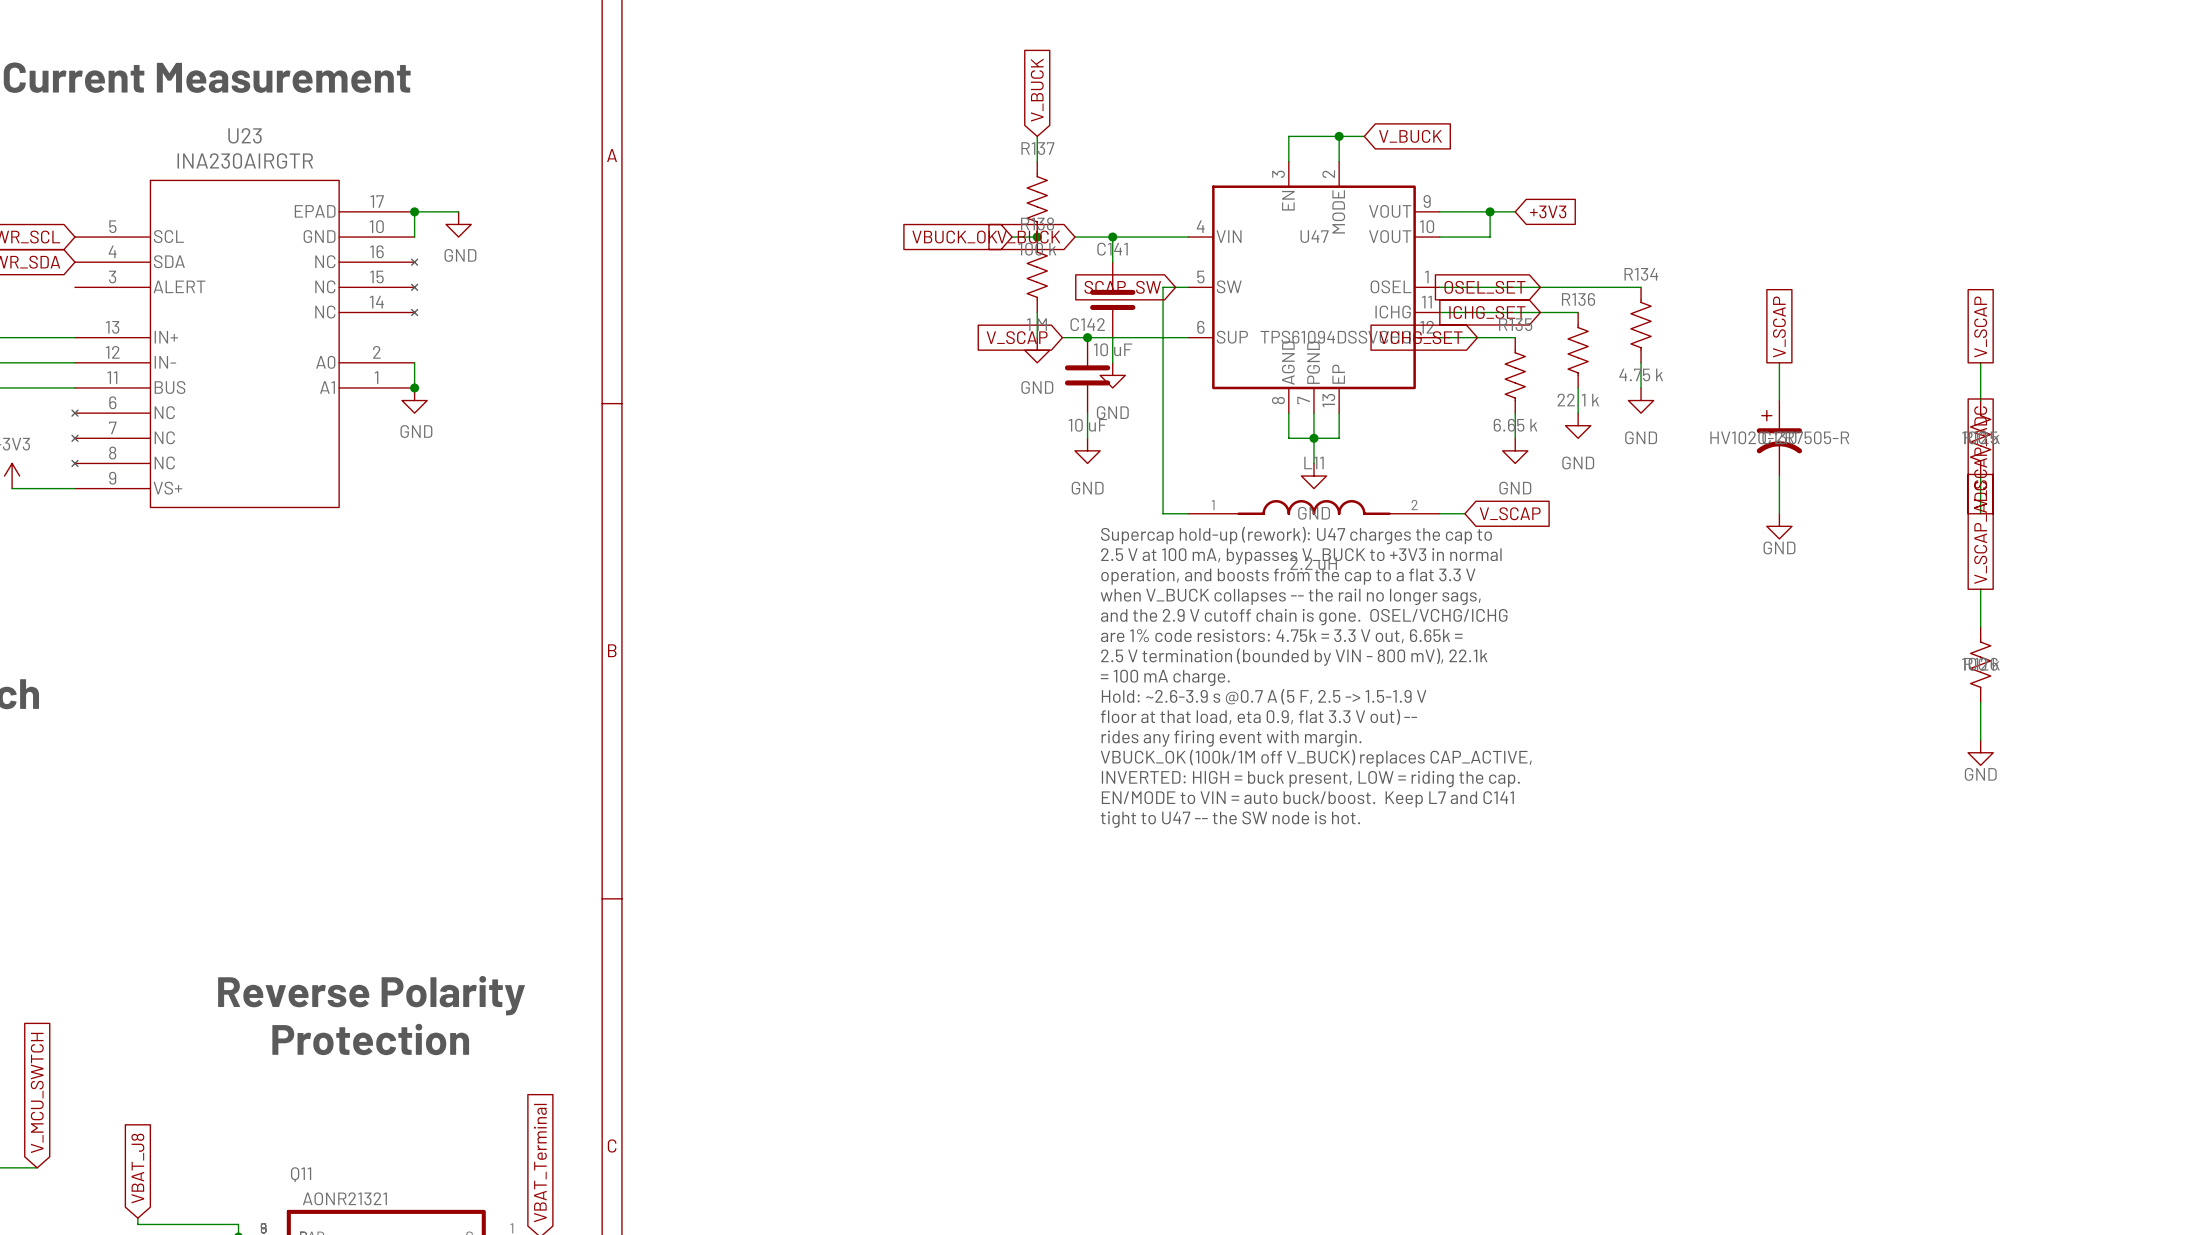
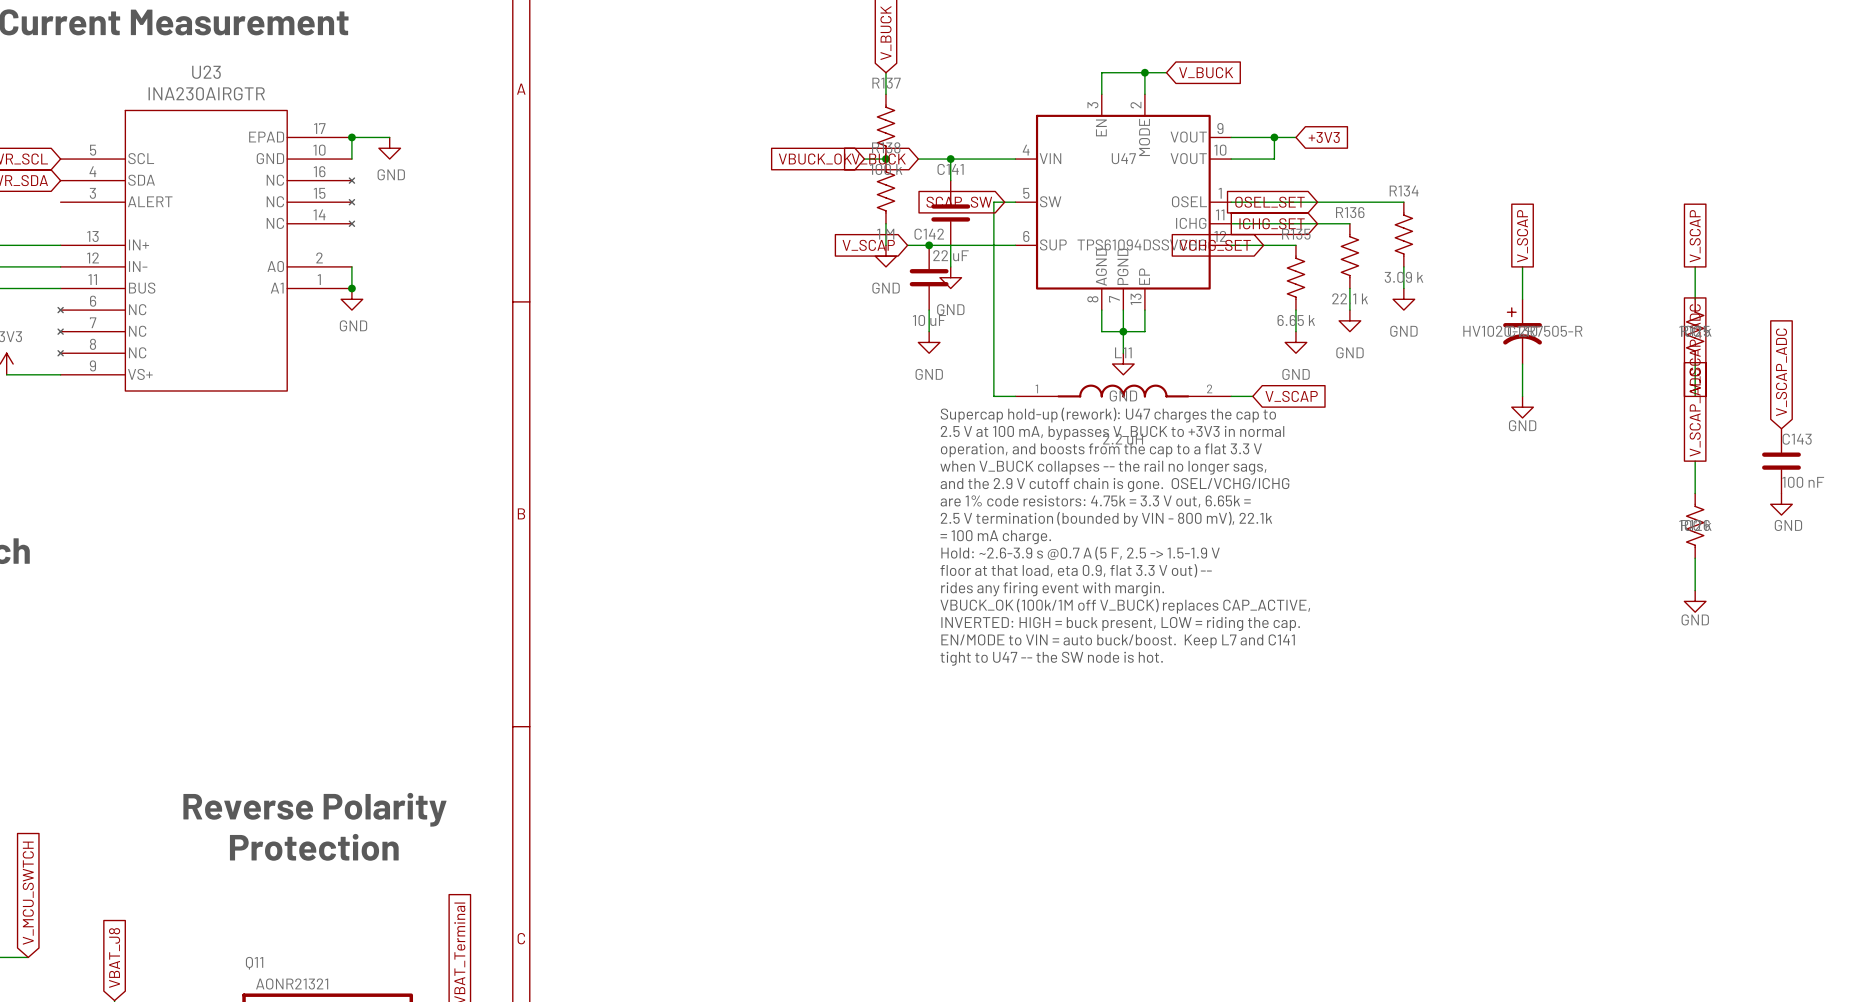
C141 value: 10 uF (1113, 349) -> 22 uF (950, 255)
R134 value: 4.75 k (1641, 374) -> 3.09 k (1404, 277)
global label: none -> V_SCAP_ADC (1781, 372)
C143: none -> 100 nF (1781, 461)
power symbol: none -> GND (1781, 504)

